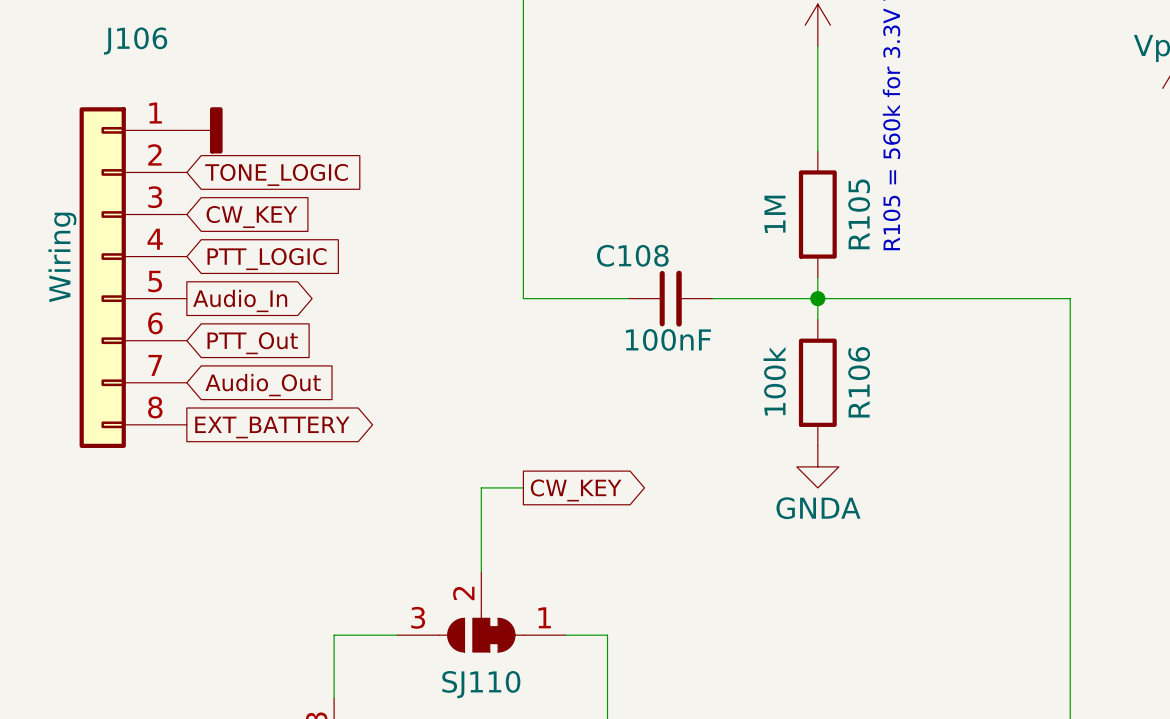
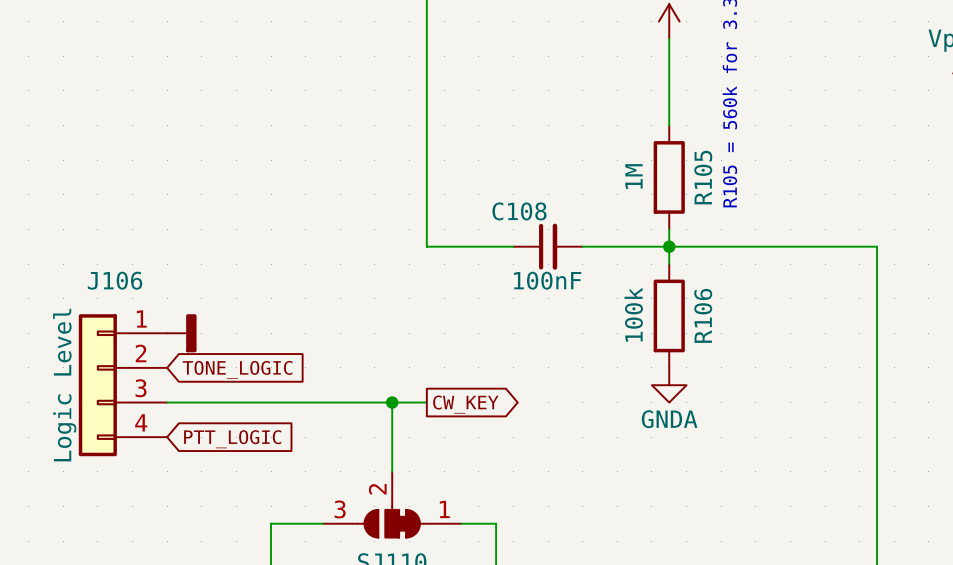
J106 name position: J106 (135, 41) -> J106 (115, 280)
J106 symbol: [79, 107, 187, 448] -> [78, 314, 168, 457]
power symbol position: (204, 130) -> (181, 333)
global label position: TONE_LOGIC (276, 174) -> TONE_LOGIC (237, 369)
global label: CW_KEY (251, 217) -> none
J106 value: Wiring (62, 257) -> Logic Level (64, 385)
global label position: PTT_LOGIC (266, 259) -> PTT_LOGIC (232, 439)
global label: Audio_In (240, 300) -> none
global label: PTT_Out (252, 343) -> none
global label: Audio_Out (263, 385) -> none
global label: EXT_BATTERY (272, 427) -> none
wire: none -> (167, 402) (392, 402)
junction: none -> (392, 402)

